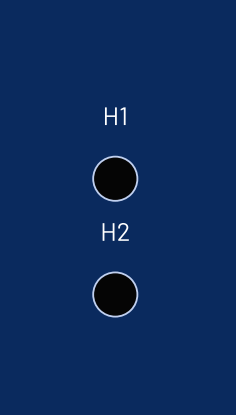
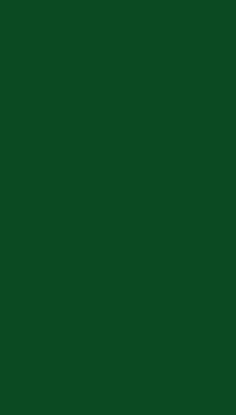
H1: (115, 178) -> none
H2: (115, 294) -> none

